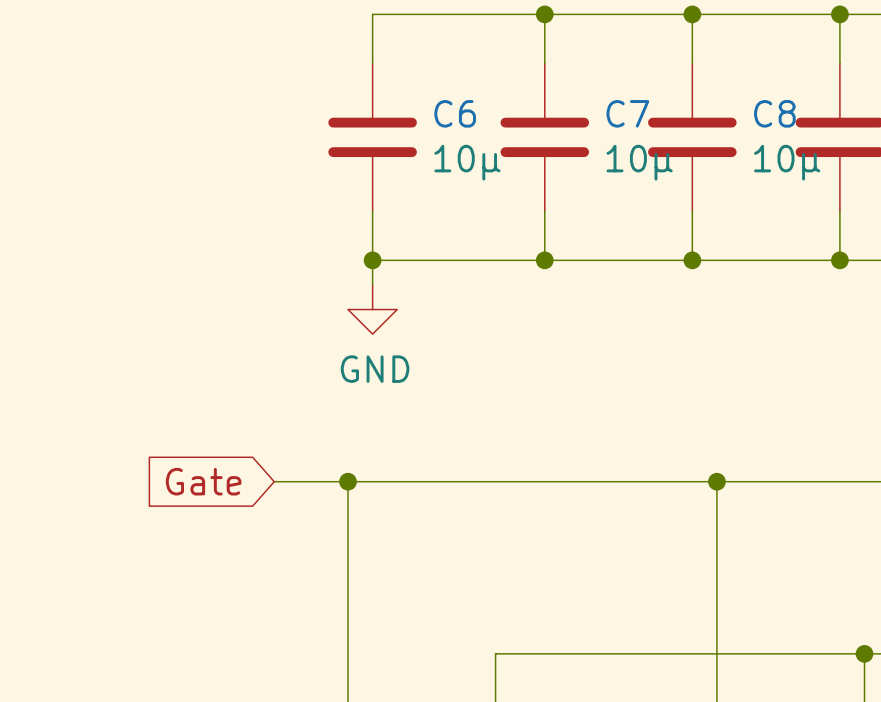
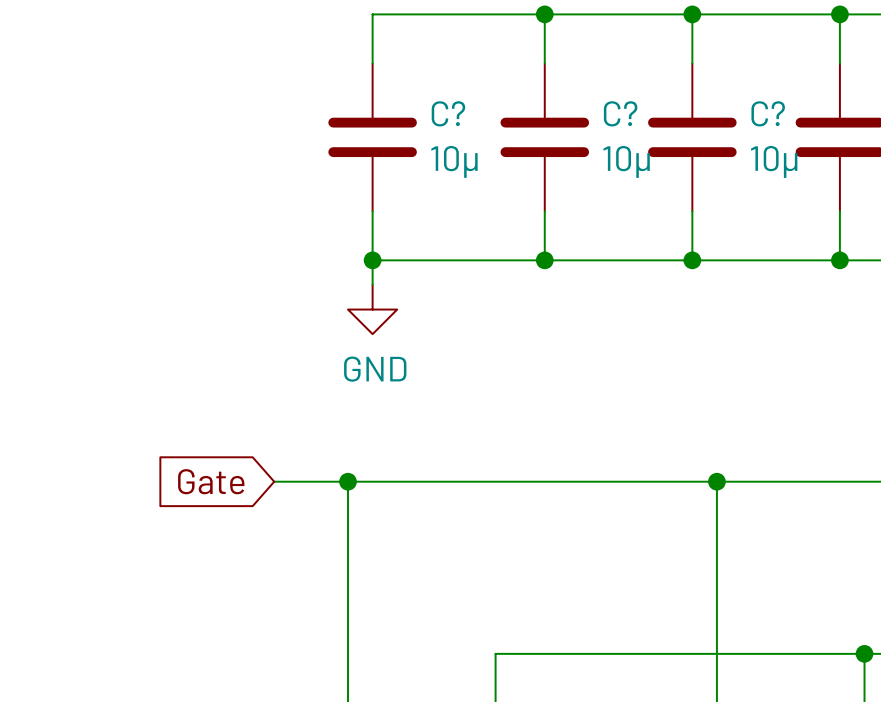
C6 name: C6 (455, 113) -> C? (448, 113)
C7 name: C7 (627, 113) -> C? (620, 113)
C8 name: C8 (774, 113) -> C? (768, 113)

